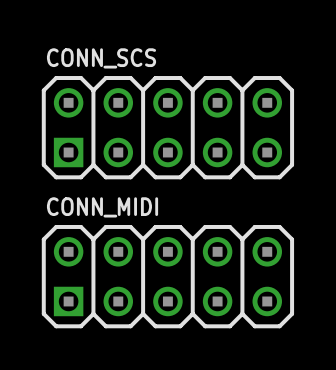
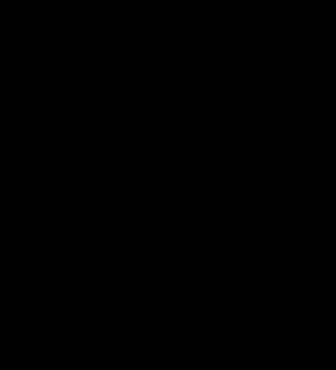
CONN_SCS: (167, 127) -> none
CONN_MIDI: (167, 276) -> none

